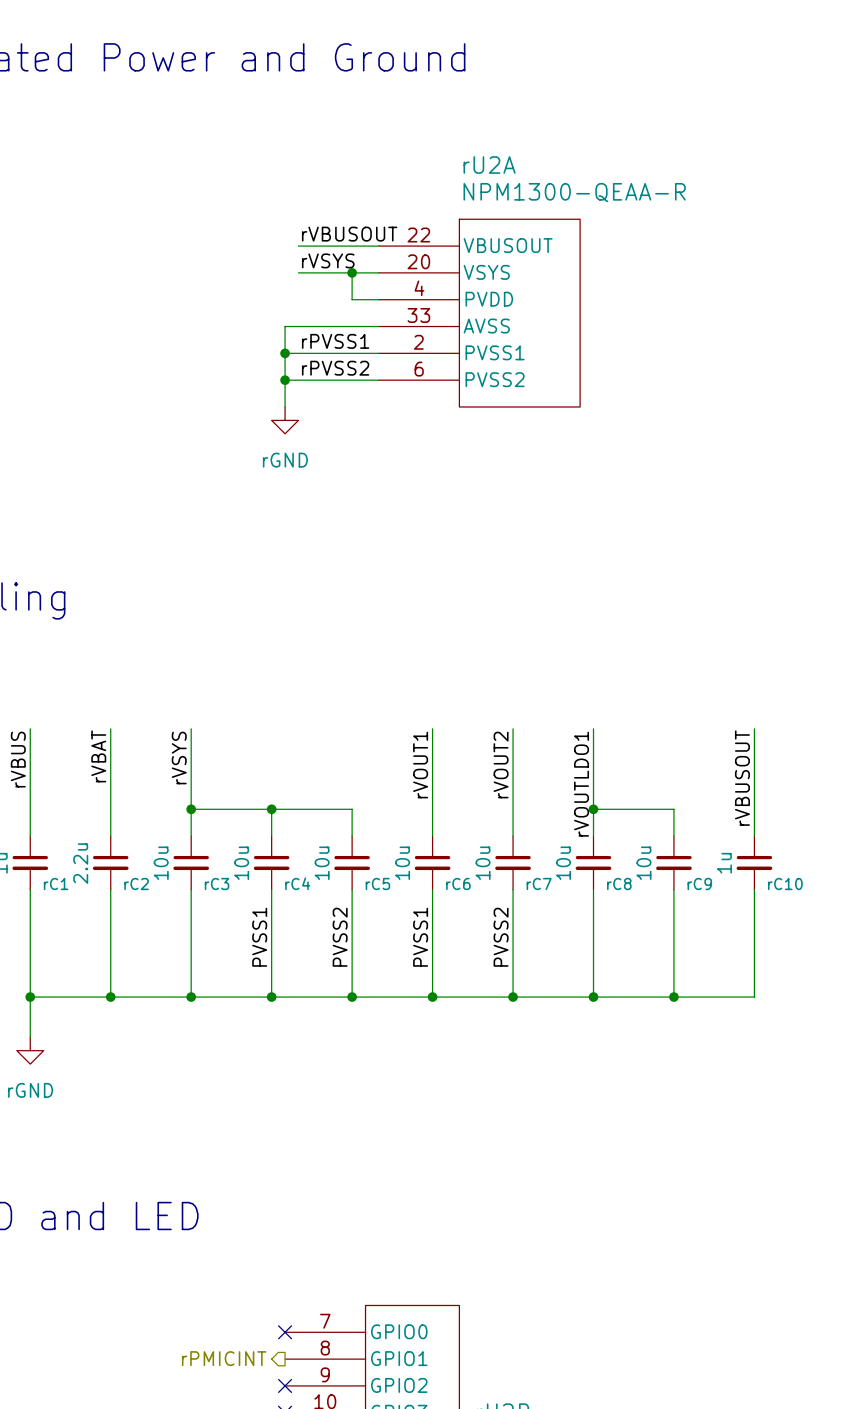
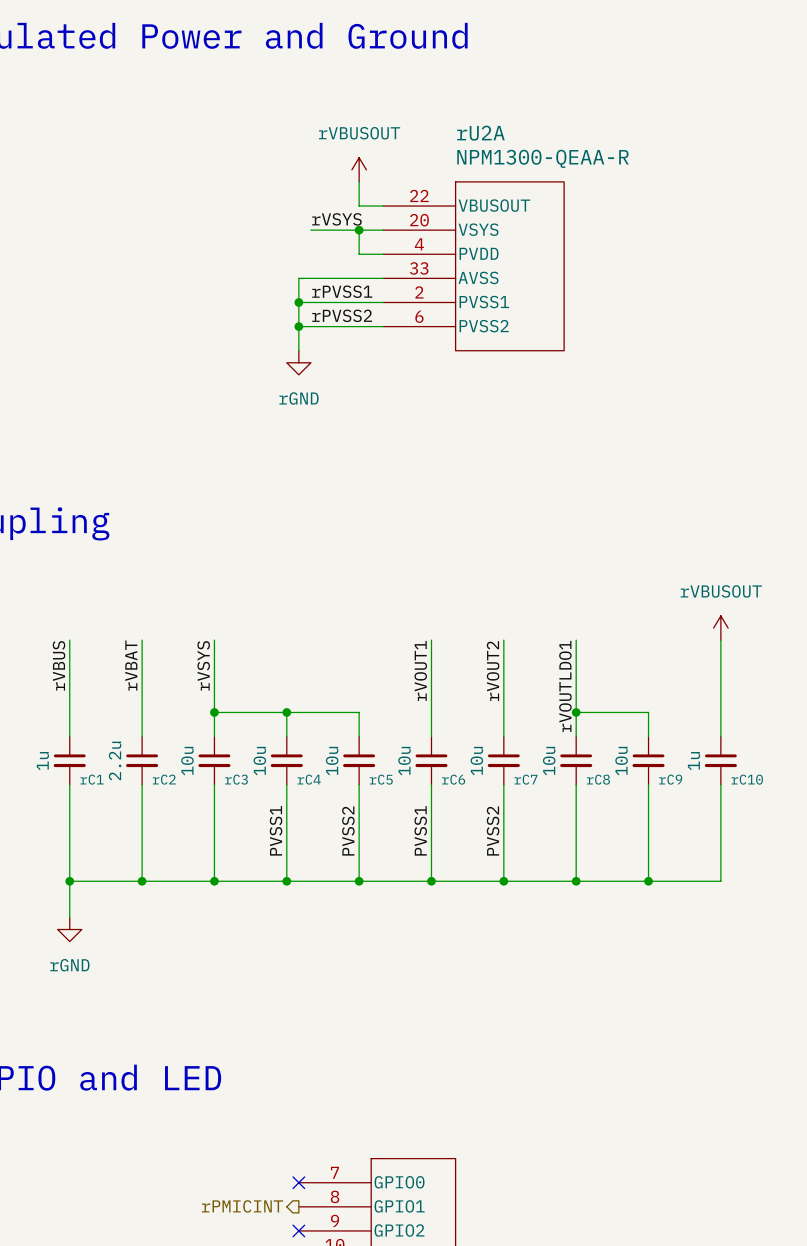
power symbol: none -> rVBUSOUT (359, 169)
label: rVBUSOUT (349, 234) -> none
wire: (298, 246) (352, 246) -> (359, 181) (359, 206)
power symbol: none -> rVBUSOUT (720, 628)
label: rVBUSOUT (742, 778) -> none

